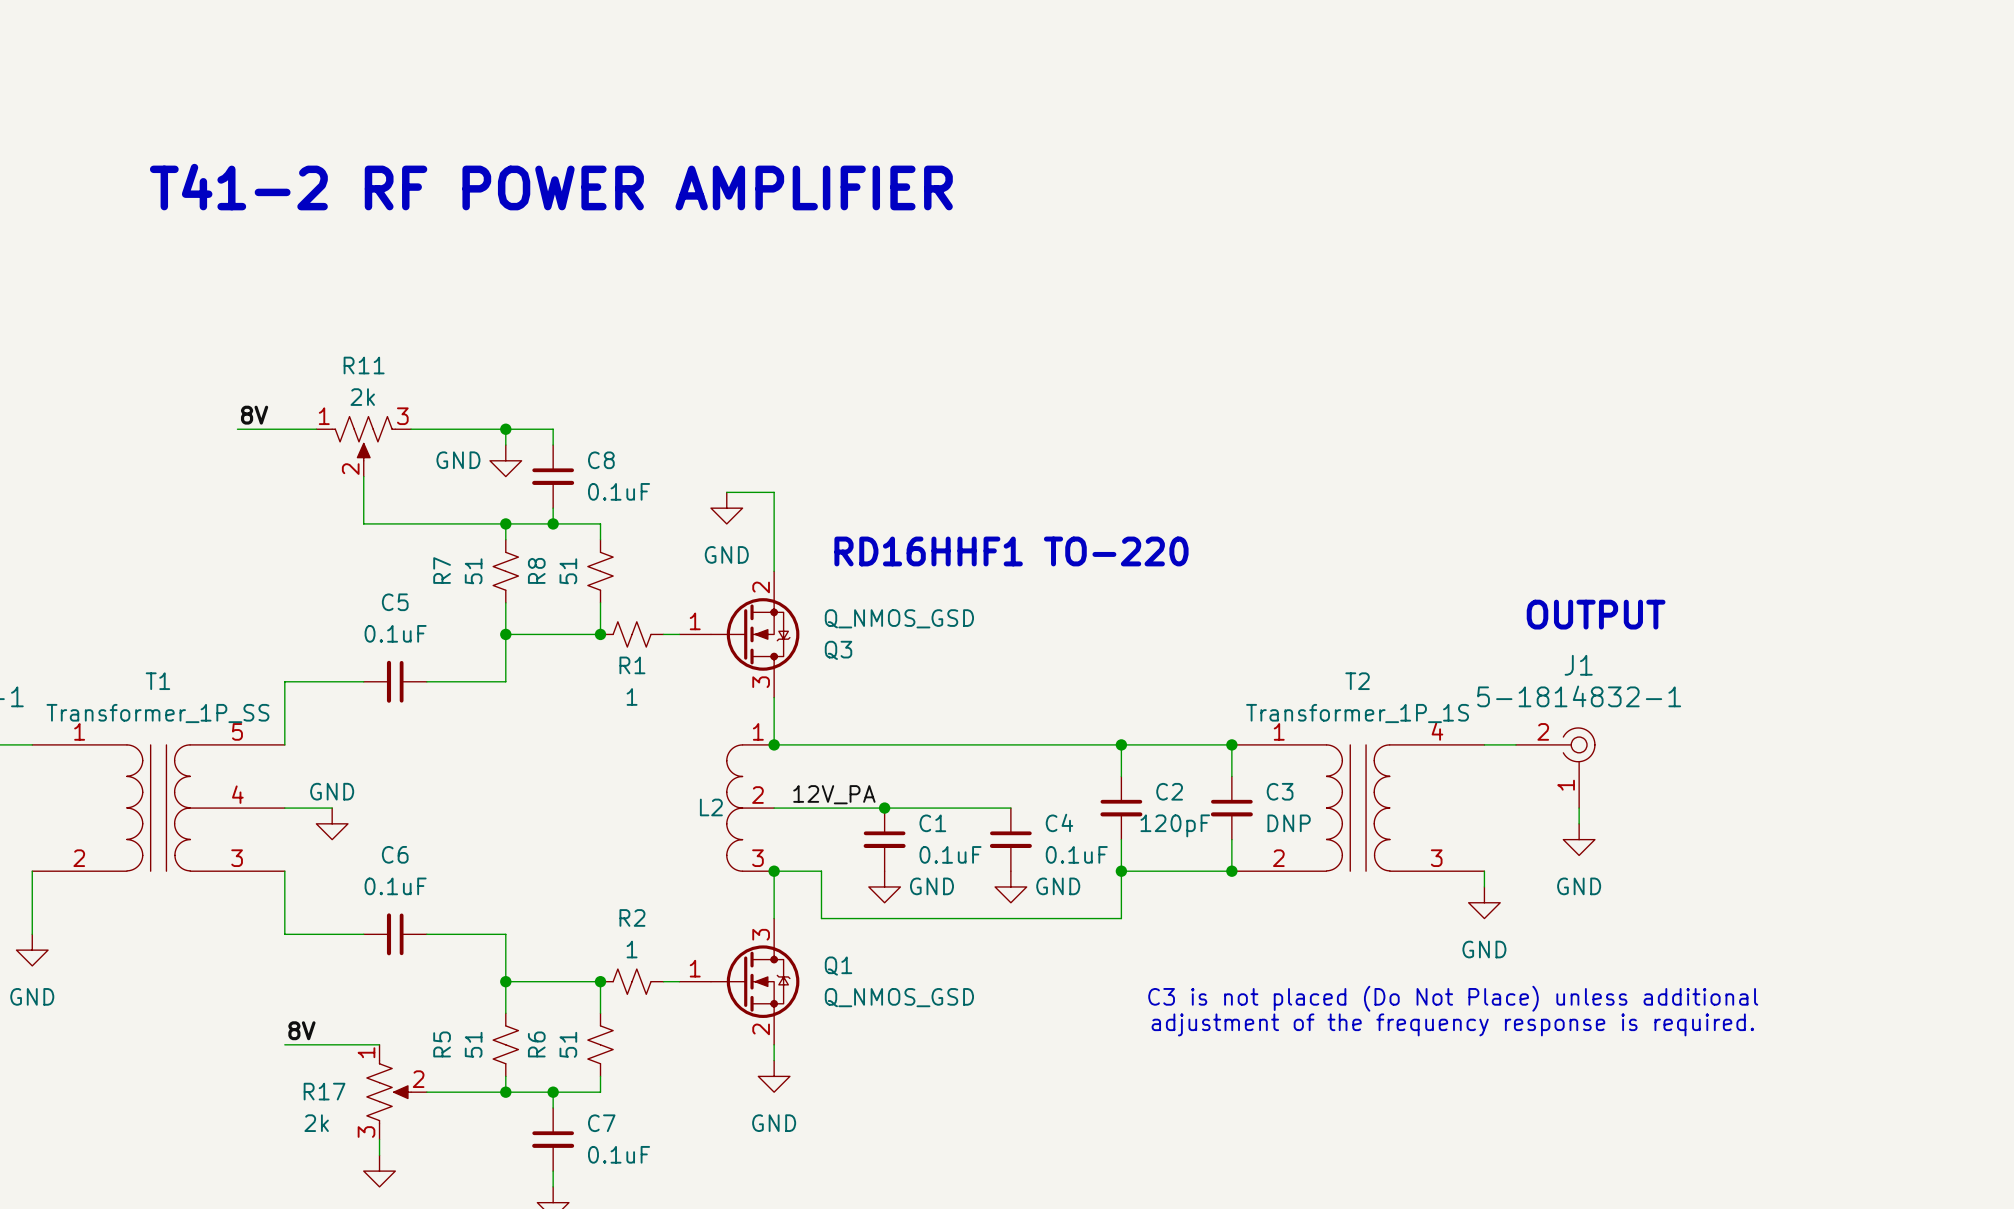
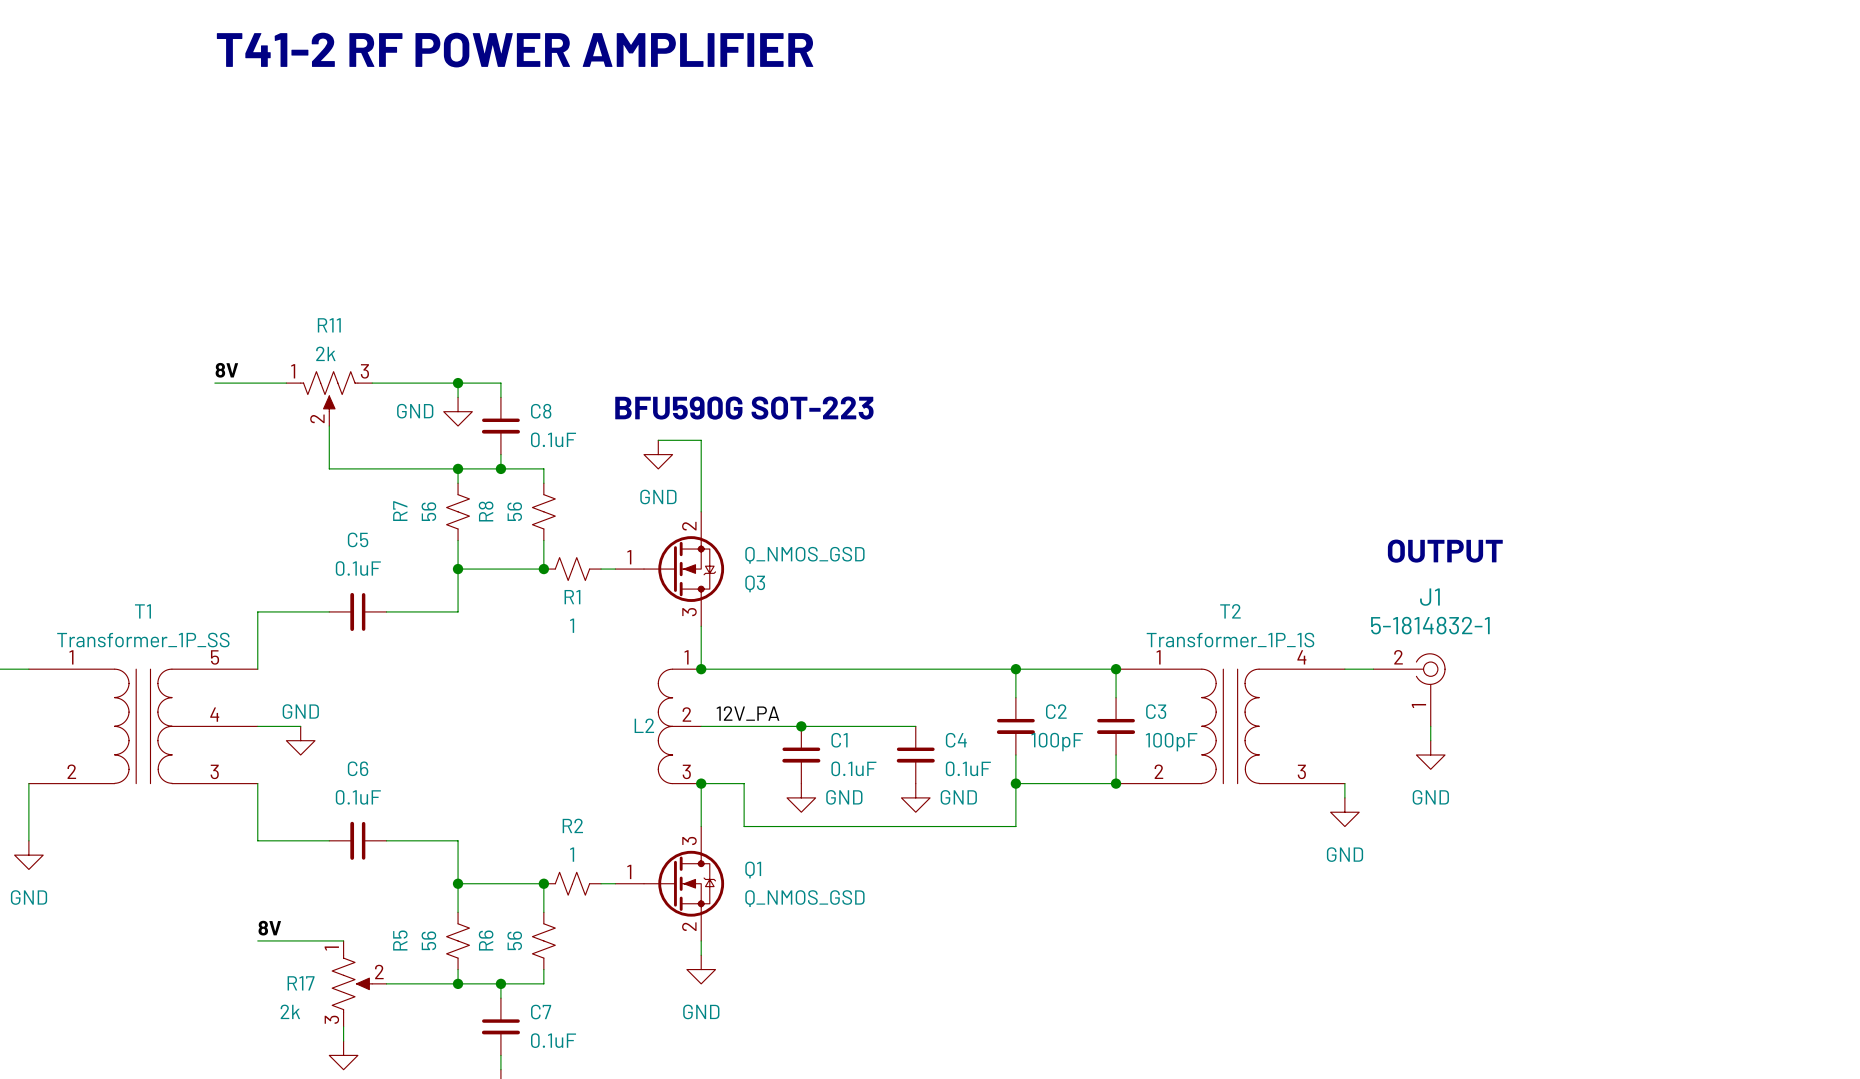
text position: T41-2 RF POWER AMPLIFIER (551, 187) -> T41-2 RF POWER AMPLIFIER (515, 50)
text: none -> BFU590G SOT-223 (744, 408)
text: RD16HHF1 TO-220 (1011, 551) -> none
R7 value: 51 (473, 571) -> 56 (428, 511)
R8 value: 51 (568, 571) -> 56 (514, 511)
C3 value: DNP (1289, 823) -> 100pF (1171, 742)
C2 value: 120pF (1175, 825) -> 100pF (1057, 742)
text: C3 is not placed (Do Not Place) unless additional (1453, 998) -> none
text: adjustment of the frequency response is required. (1452, 1024) -> none
R5 value: 51 (473, 1044) -> 56 (428, 940)
R6 value: 51 (568, 1044) -> 56 (514, 940)

